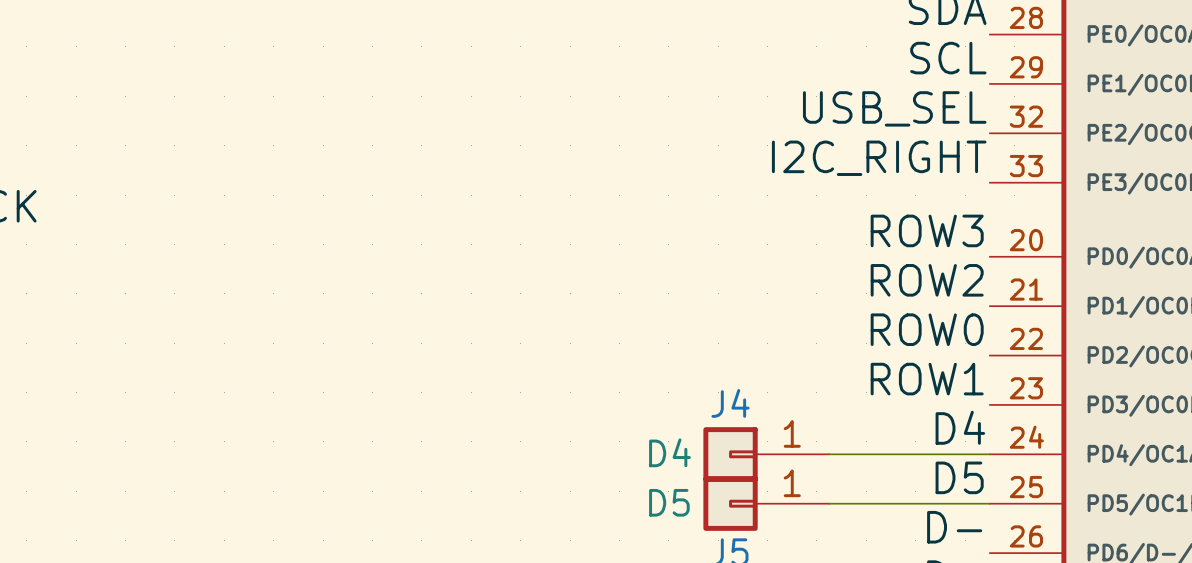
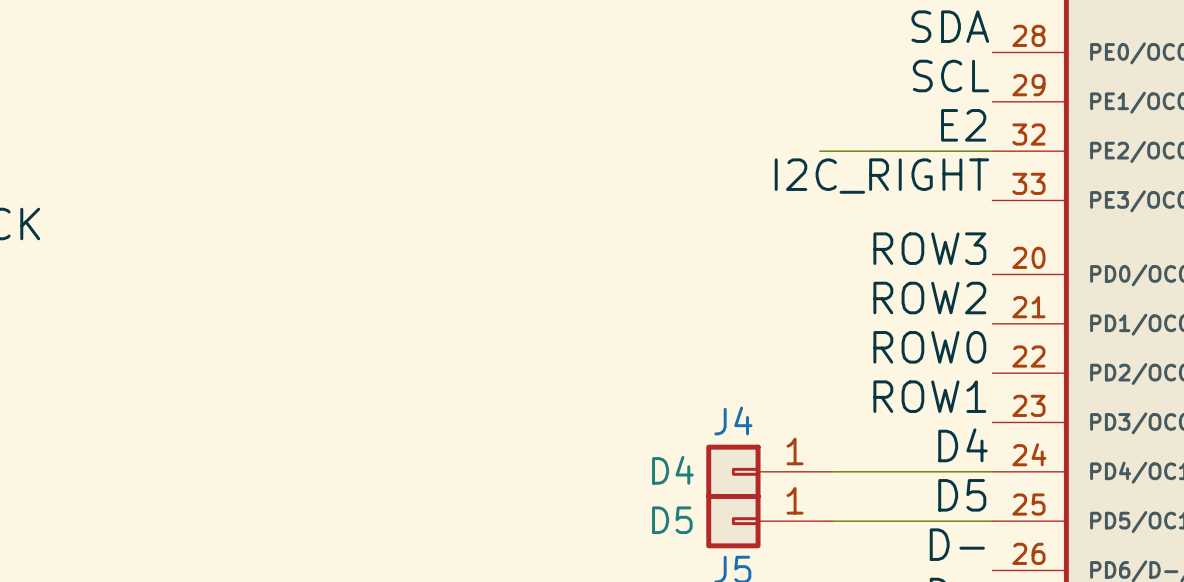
label: USB_SEL (894, 108) -> E2 (963, 125)
wire: none -> (819, 151) (992, 151)

